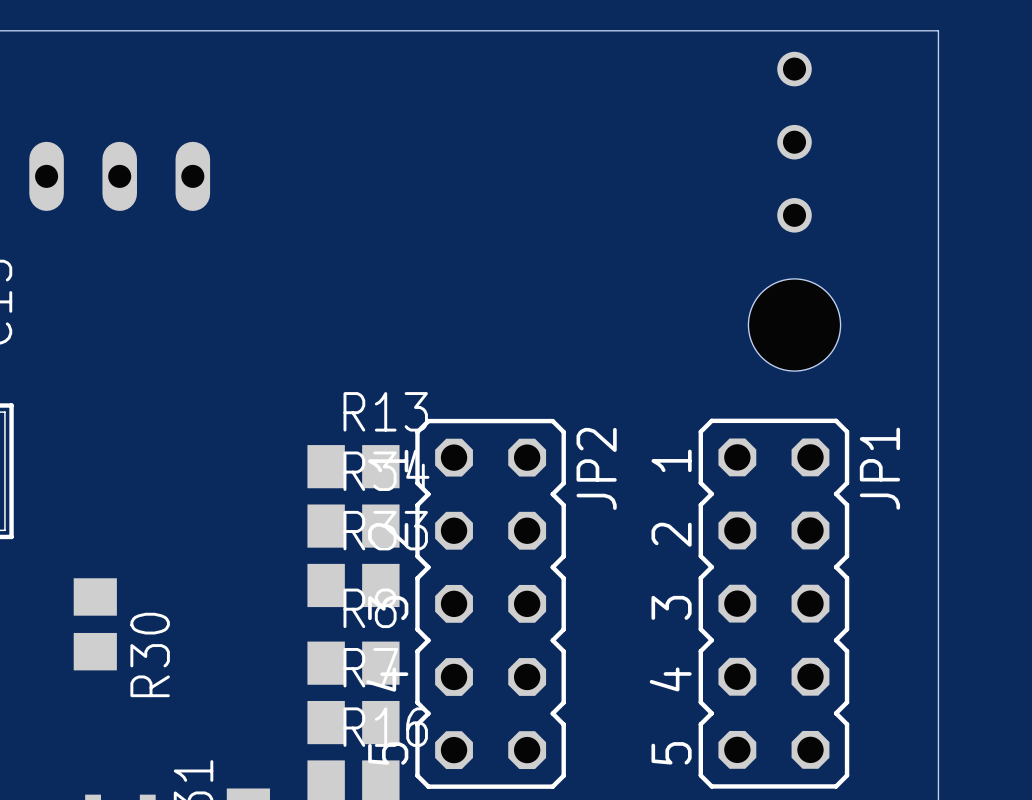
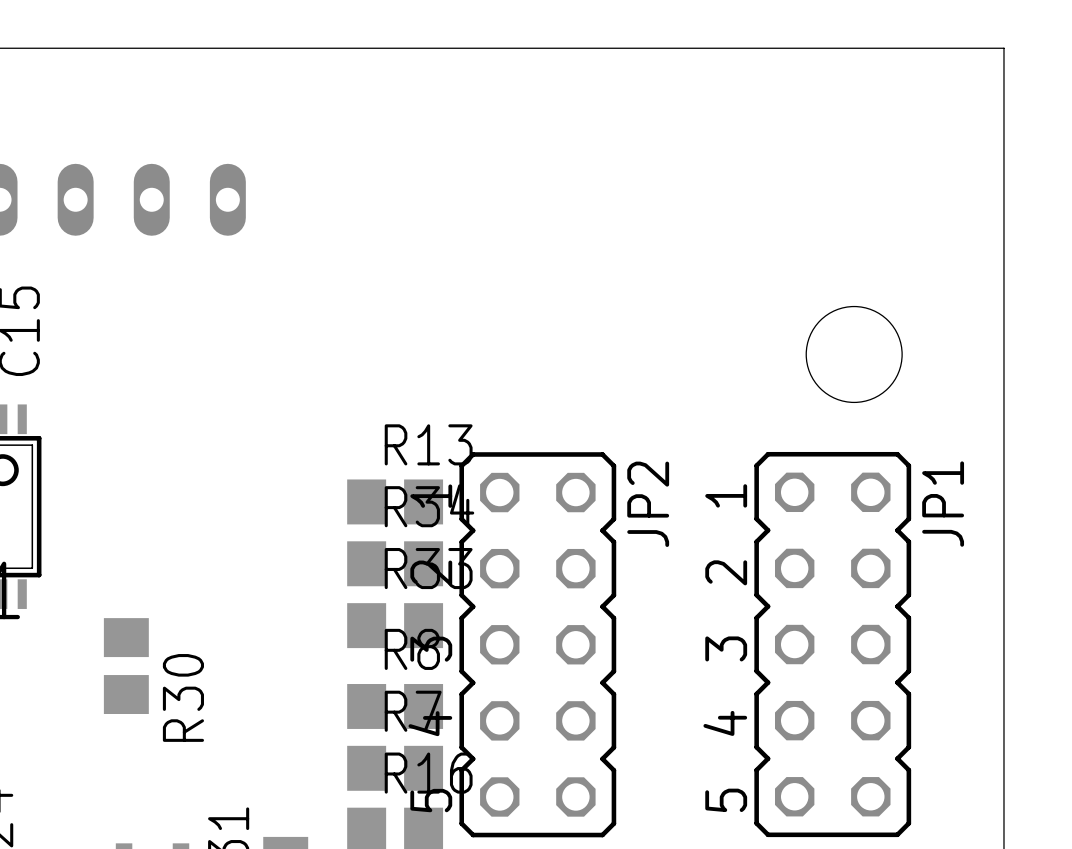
part: (794, 142) -> none

